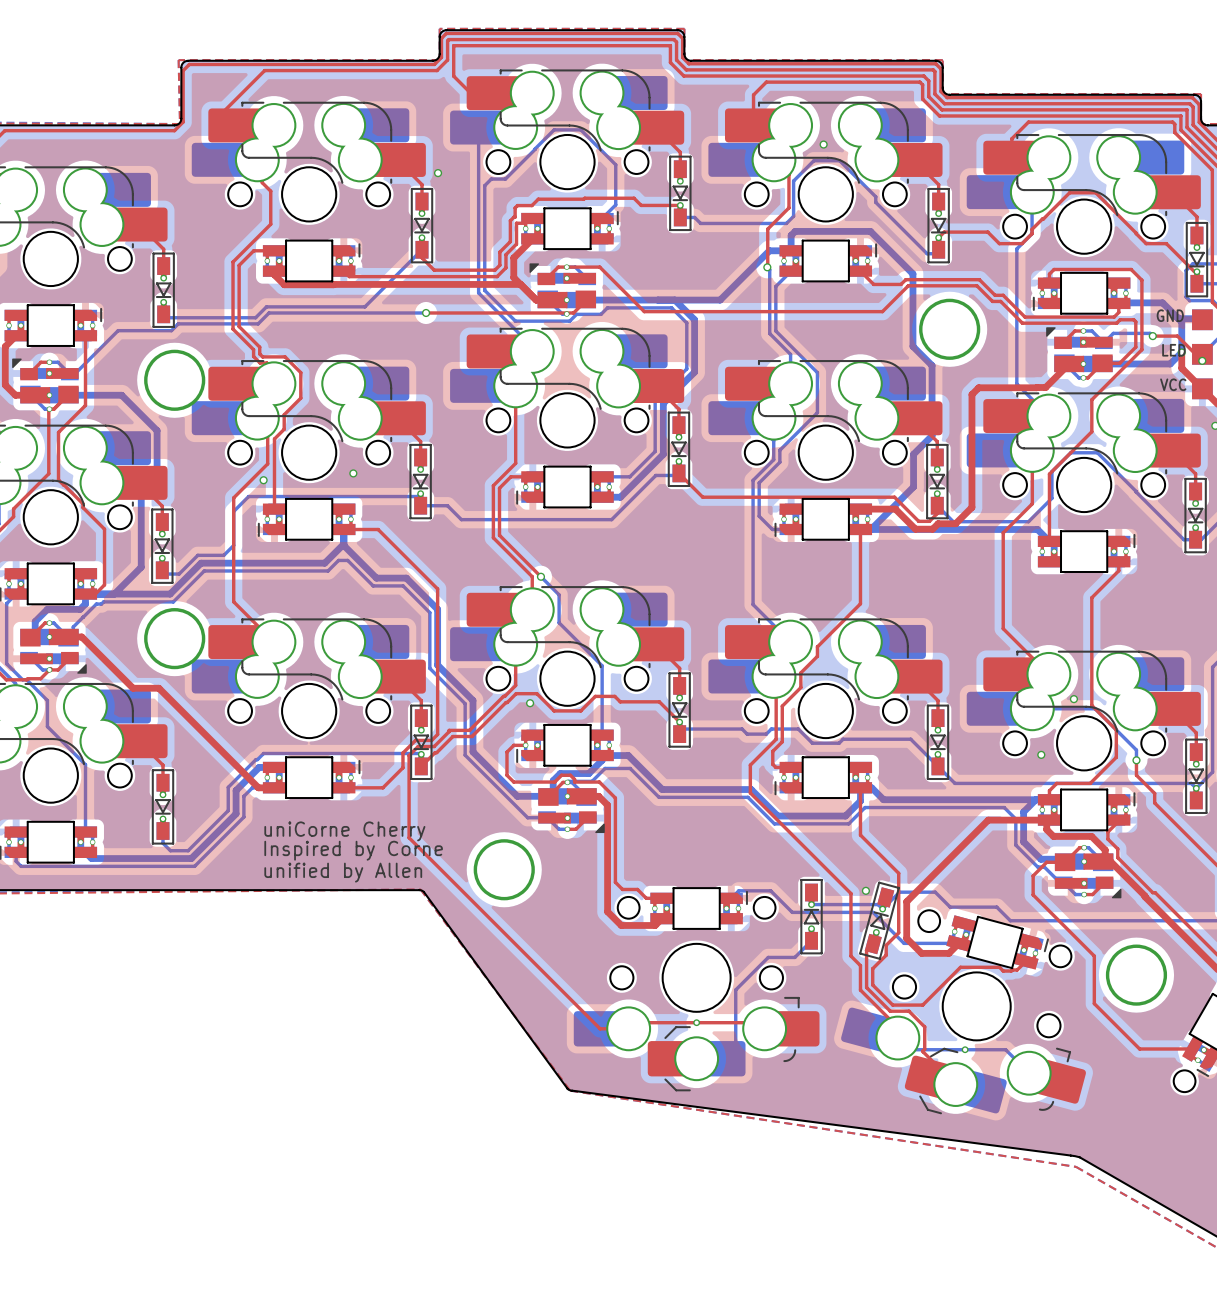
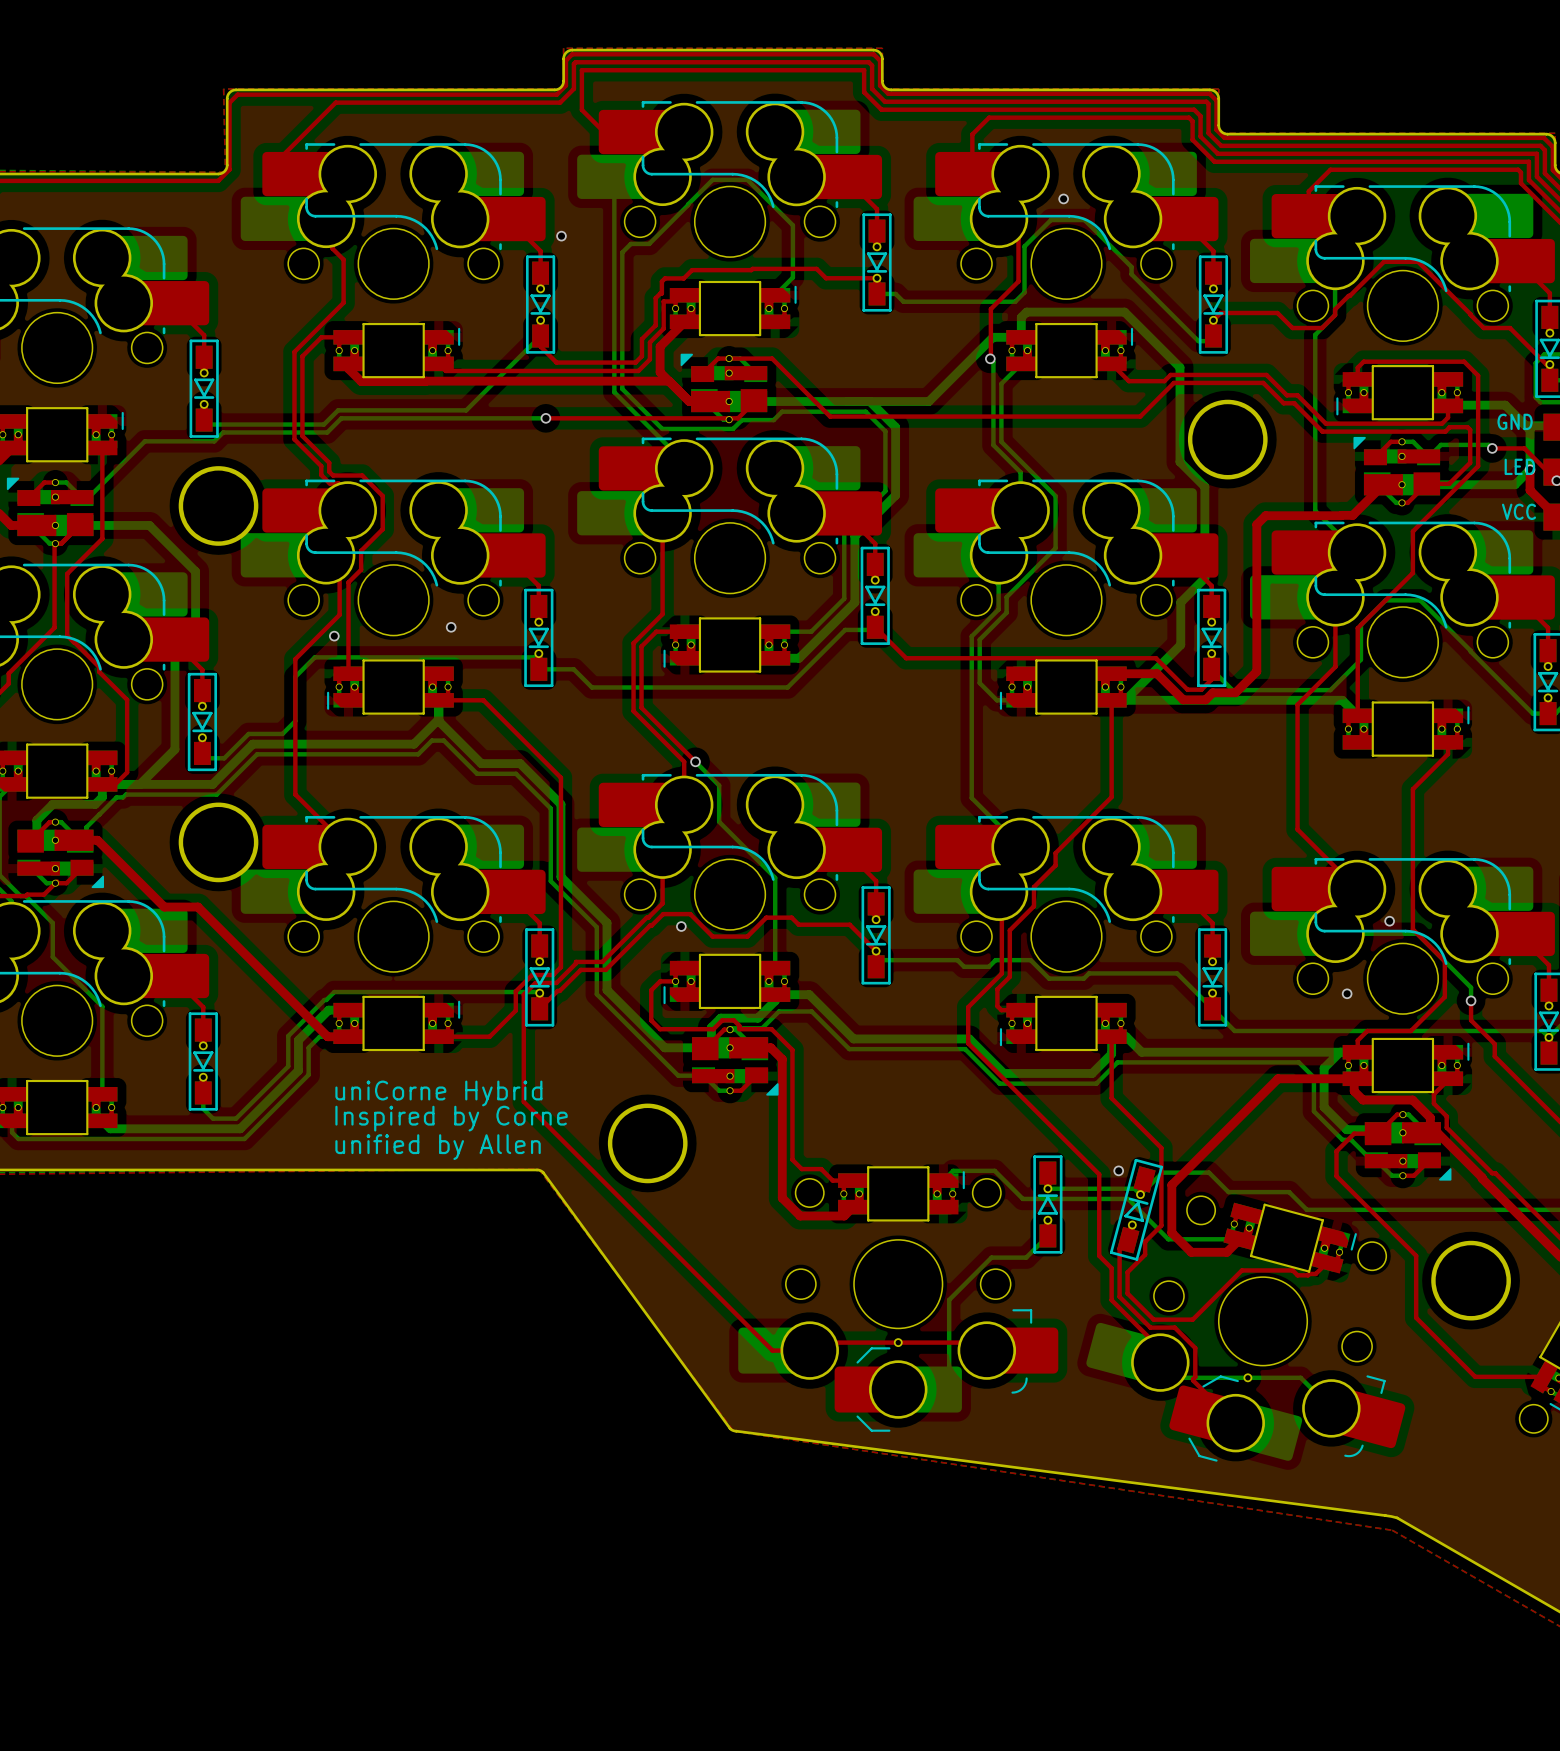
text: uniCorne Cherry (344, 831) -> uniCorne Hybrid (438, 1093)

